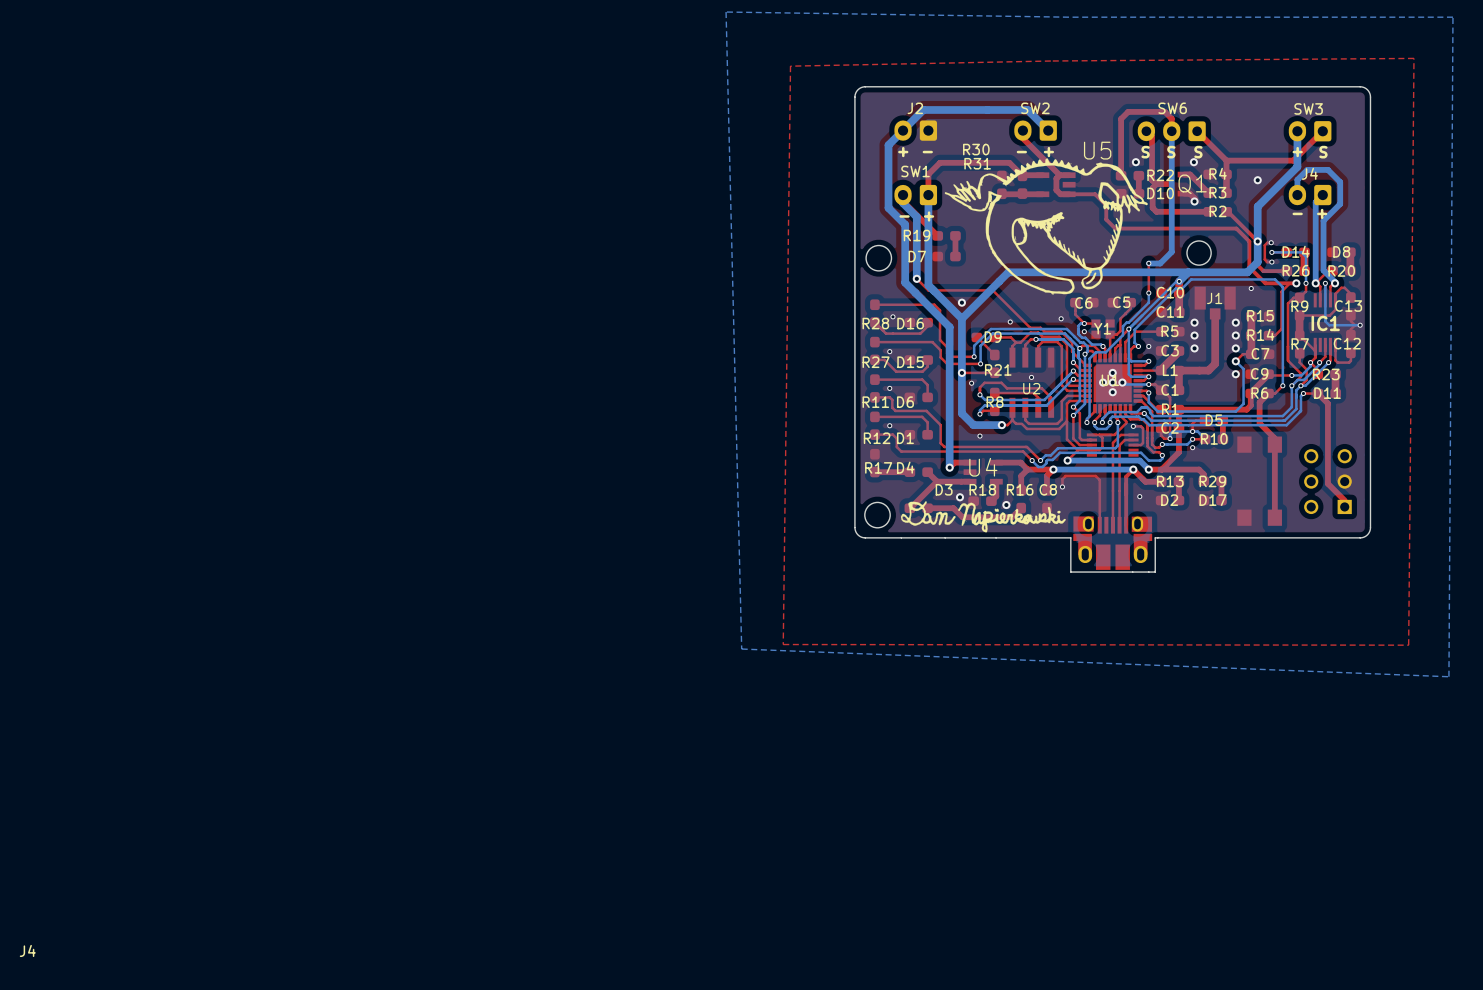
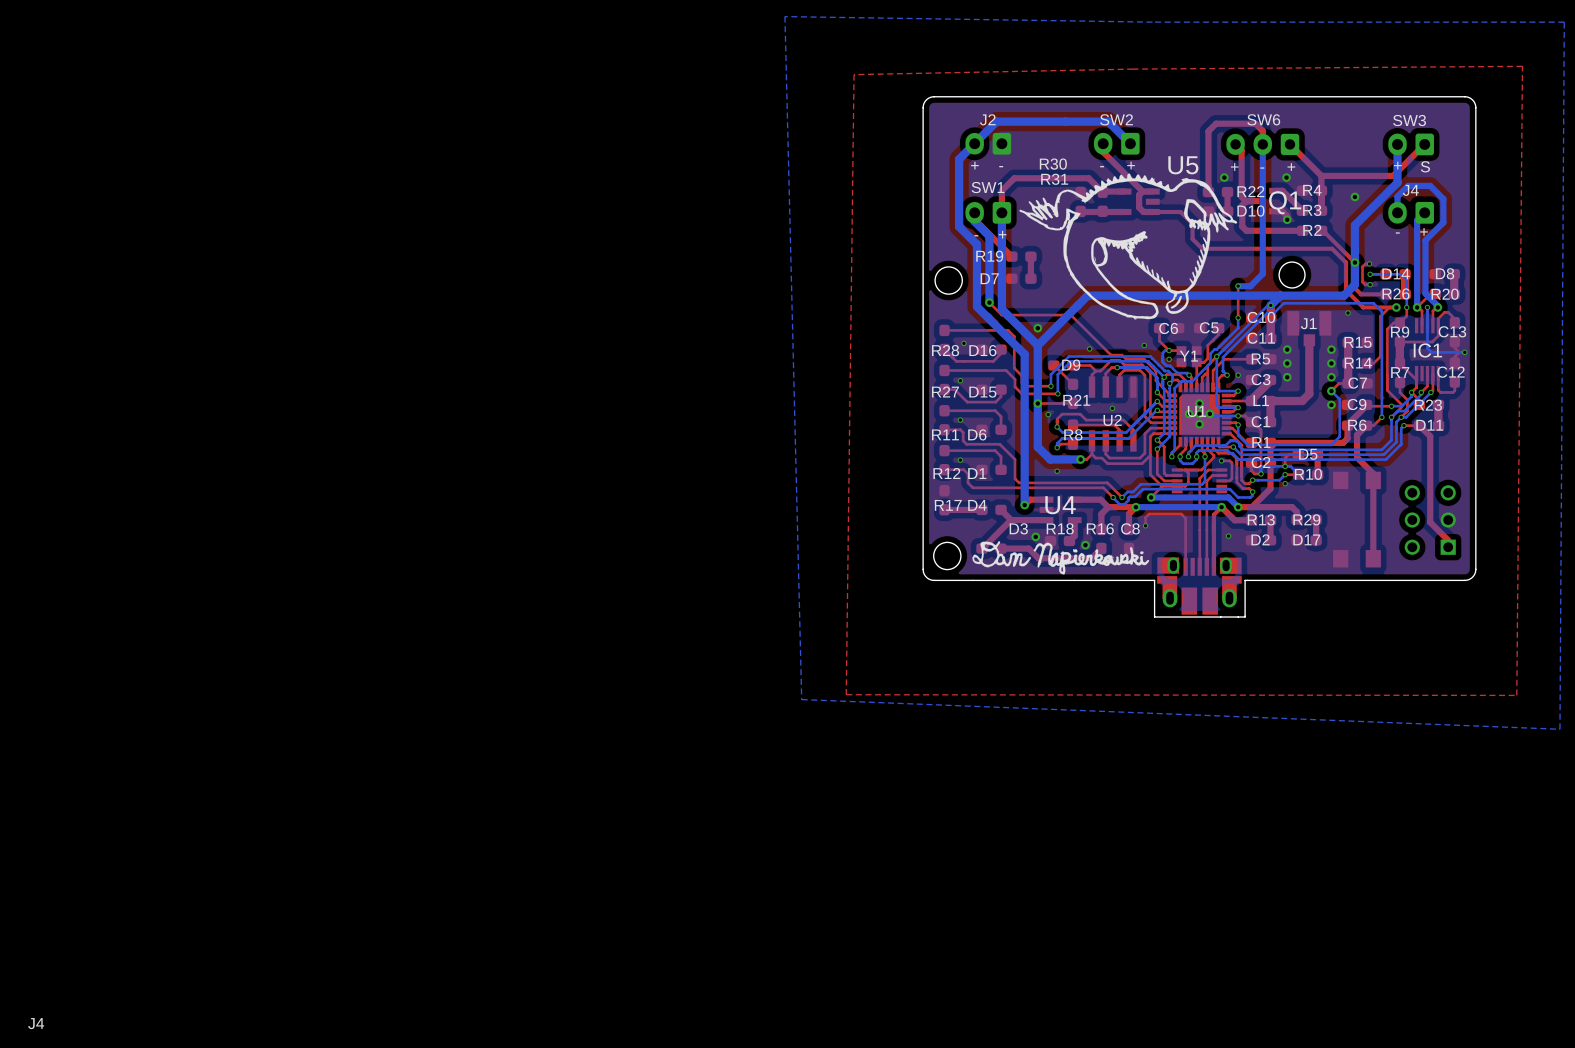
text: S (1145, 152) -> + (1234, 167)
text: S (1171, 152) -> - (1262, 168)
text: S (1198, 152) -> + (1291, 167)

